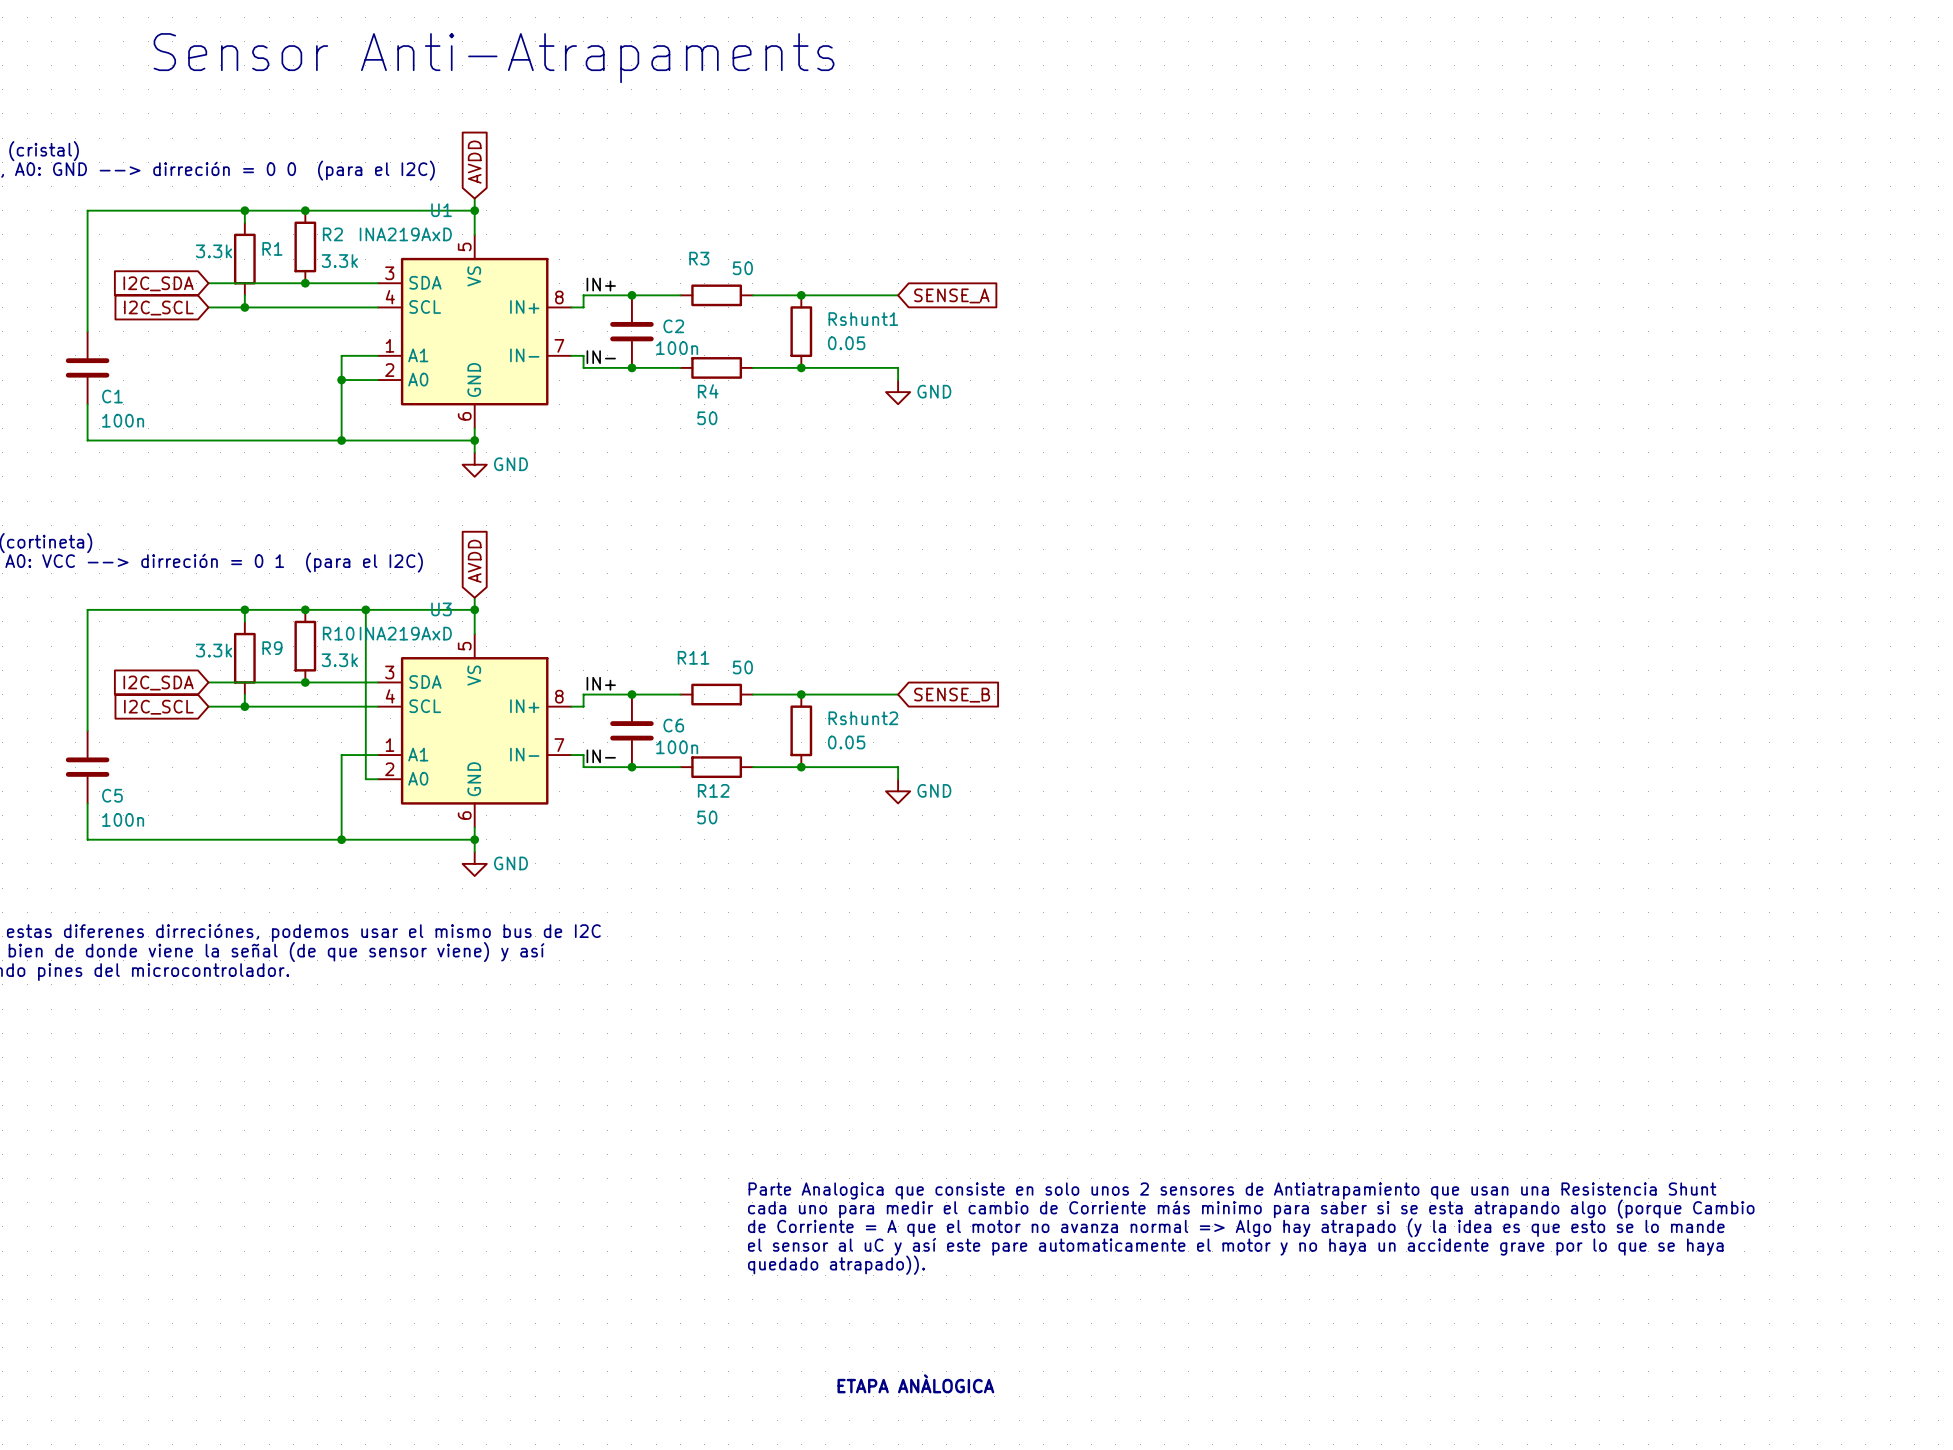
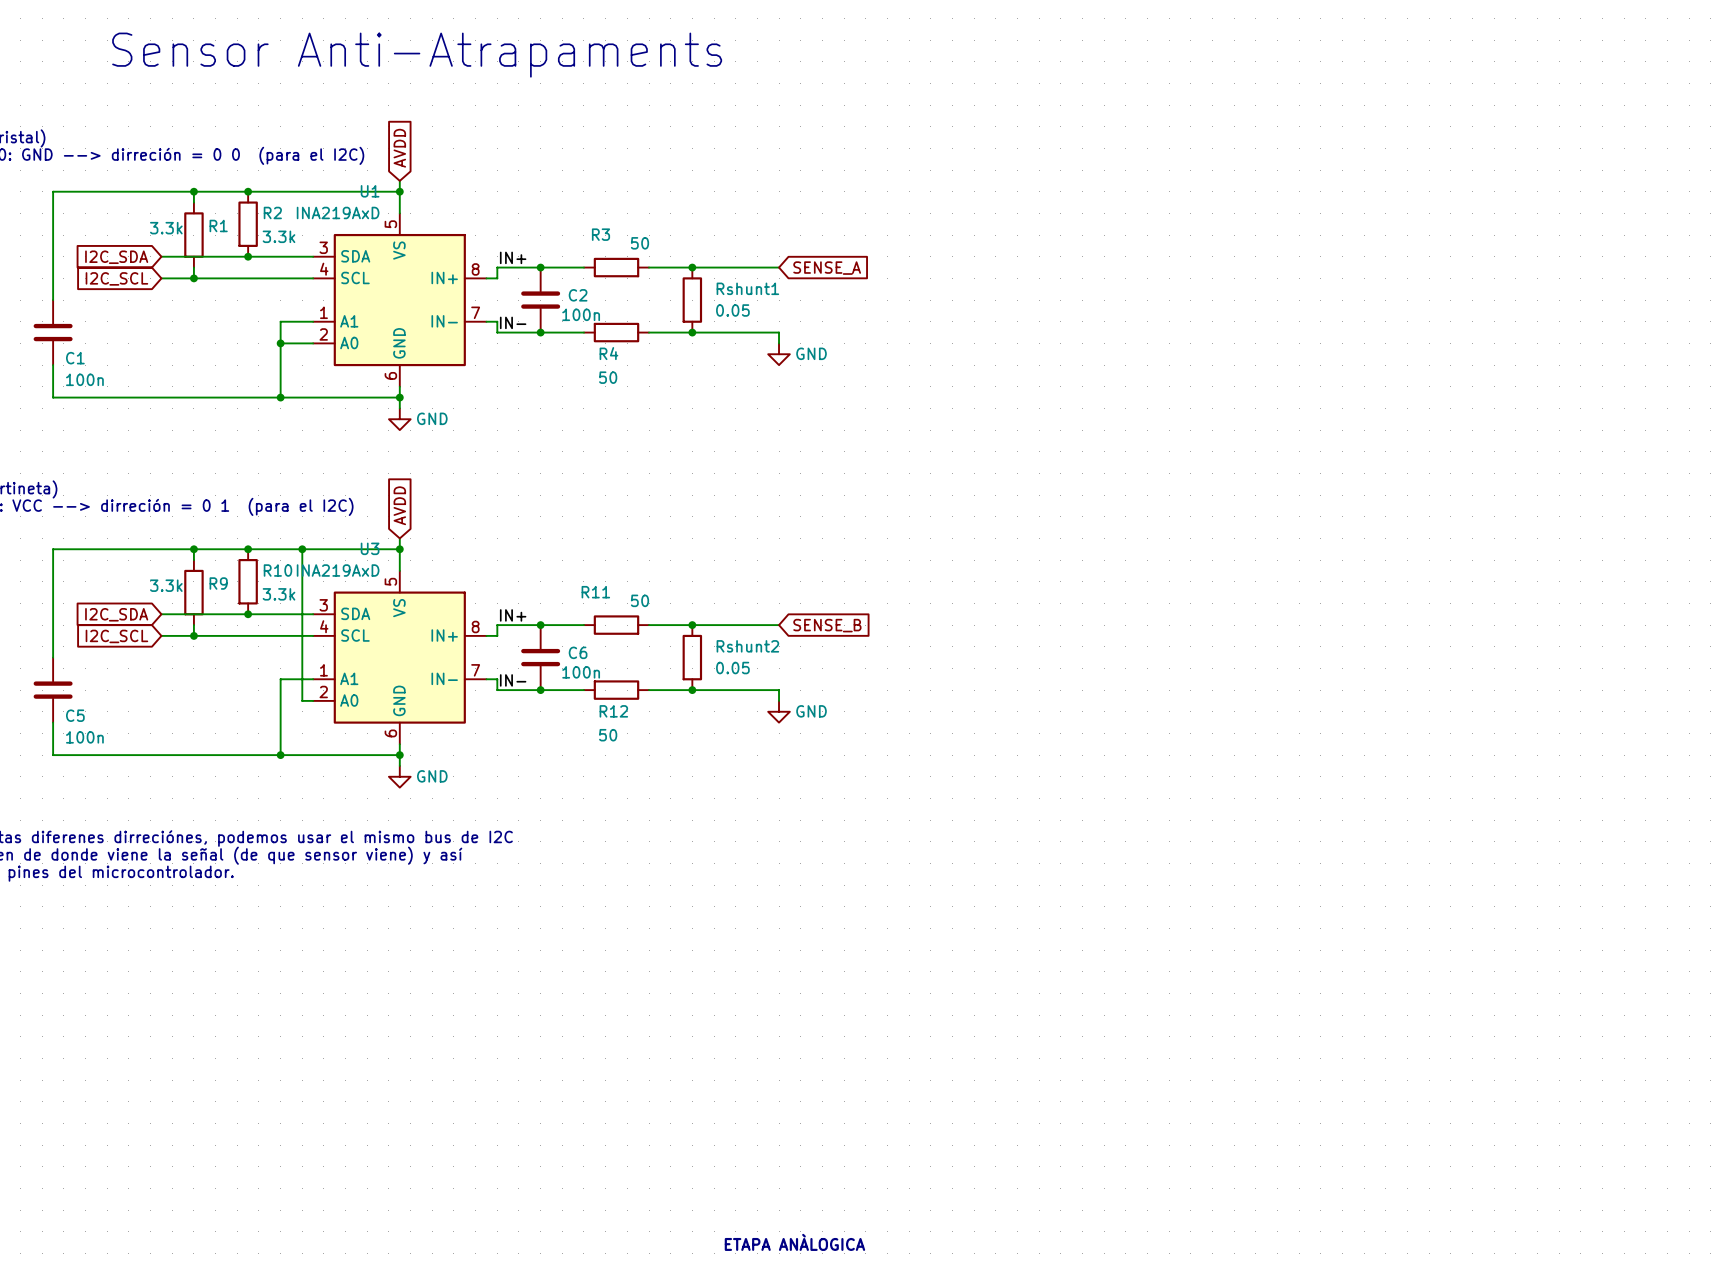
text: Parte Analogica que consiste en solo unos 2 sensores de Antiatrapamiento que usan una Resistencia Shunt (1232, 1190) -> none
text: cada uno para medir el cambio de Corriente más minimo para saber si se esta atrapando algo (porque Cambio (1251, 1209) -> none
text: de Corriente = A que el motor no avanza normal => Algo hay atrapado (y la idea es que esto se lo mande (1236, 1227) -> none
text: el sensor al uC y así este pare automaticamente el motor y no haya un accidente grave por lo que se haya (1235, 1246) -> none
text: quedado atrapado)). (836, 1265) -> none

